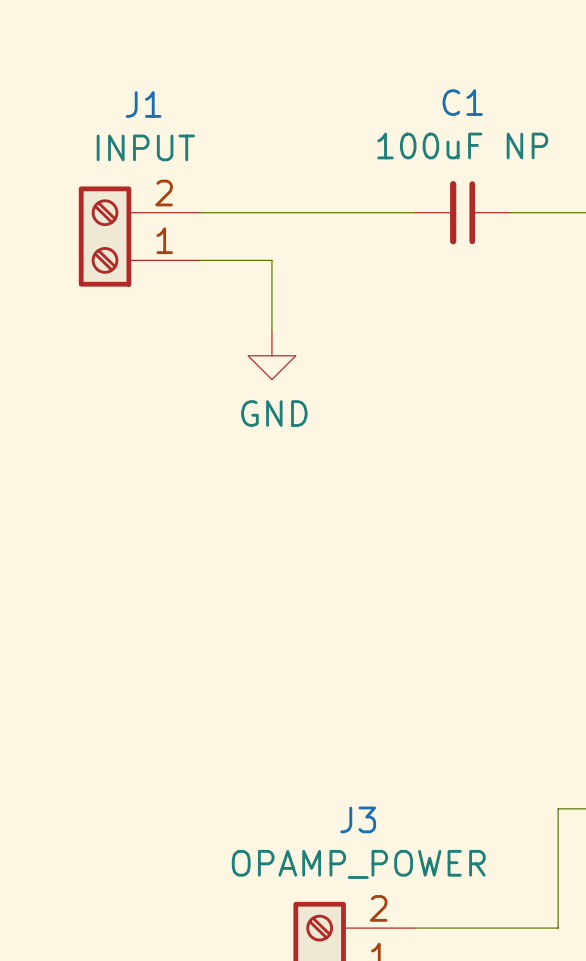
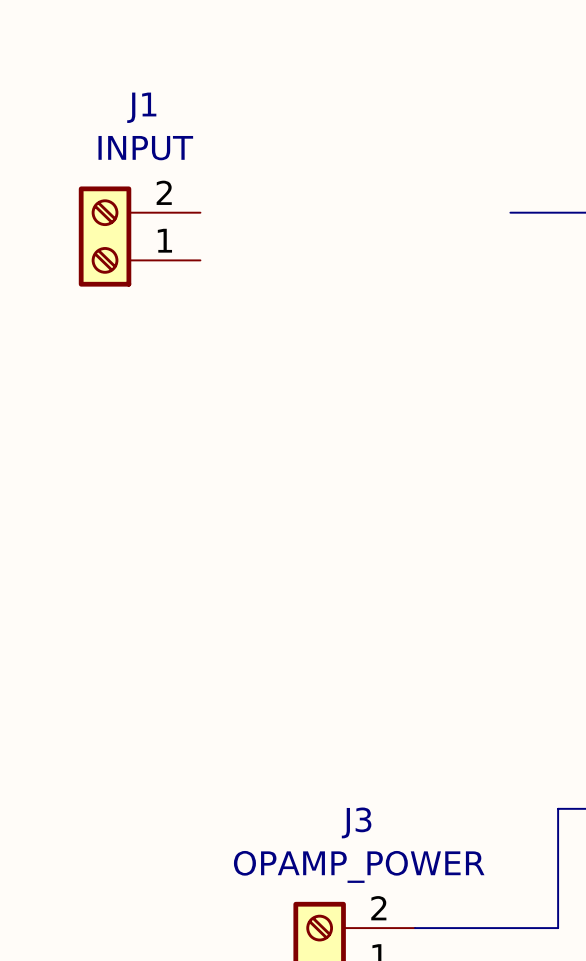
wire: (200, 212) (415, 212) -> none
C1: 100uF NP (462, 212) -> none
wire: (200, 260) (271, 260) (271, 331) -> none
power symbol: GND (271, 355) -> none

